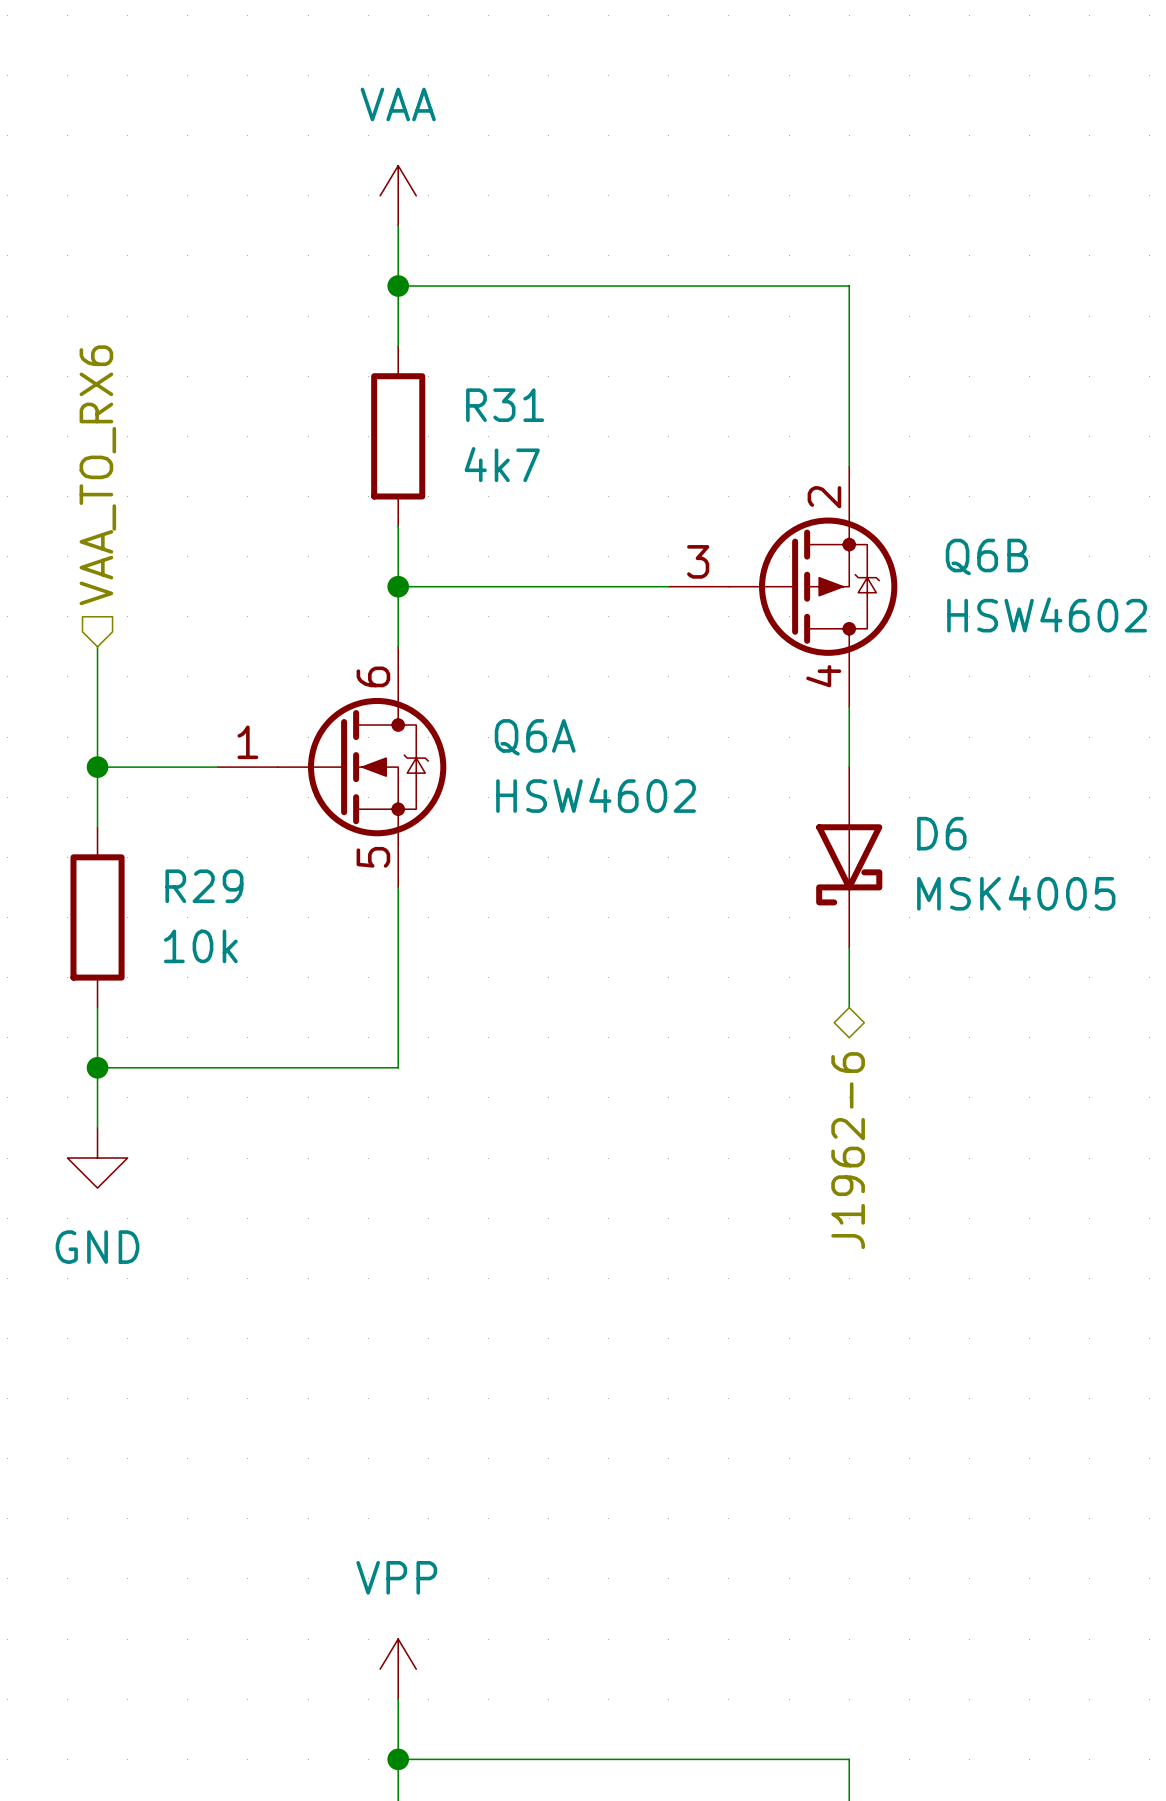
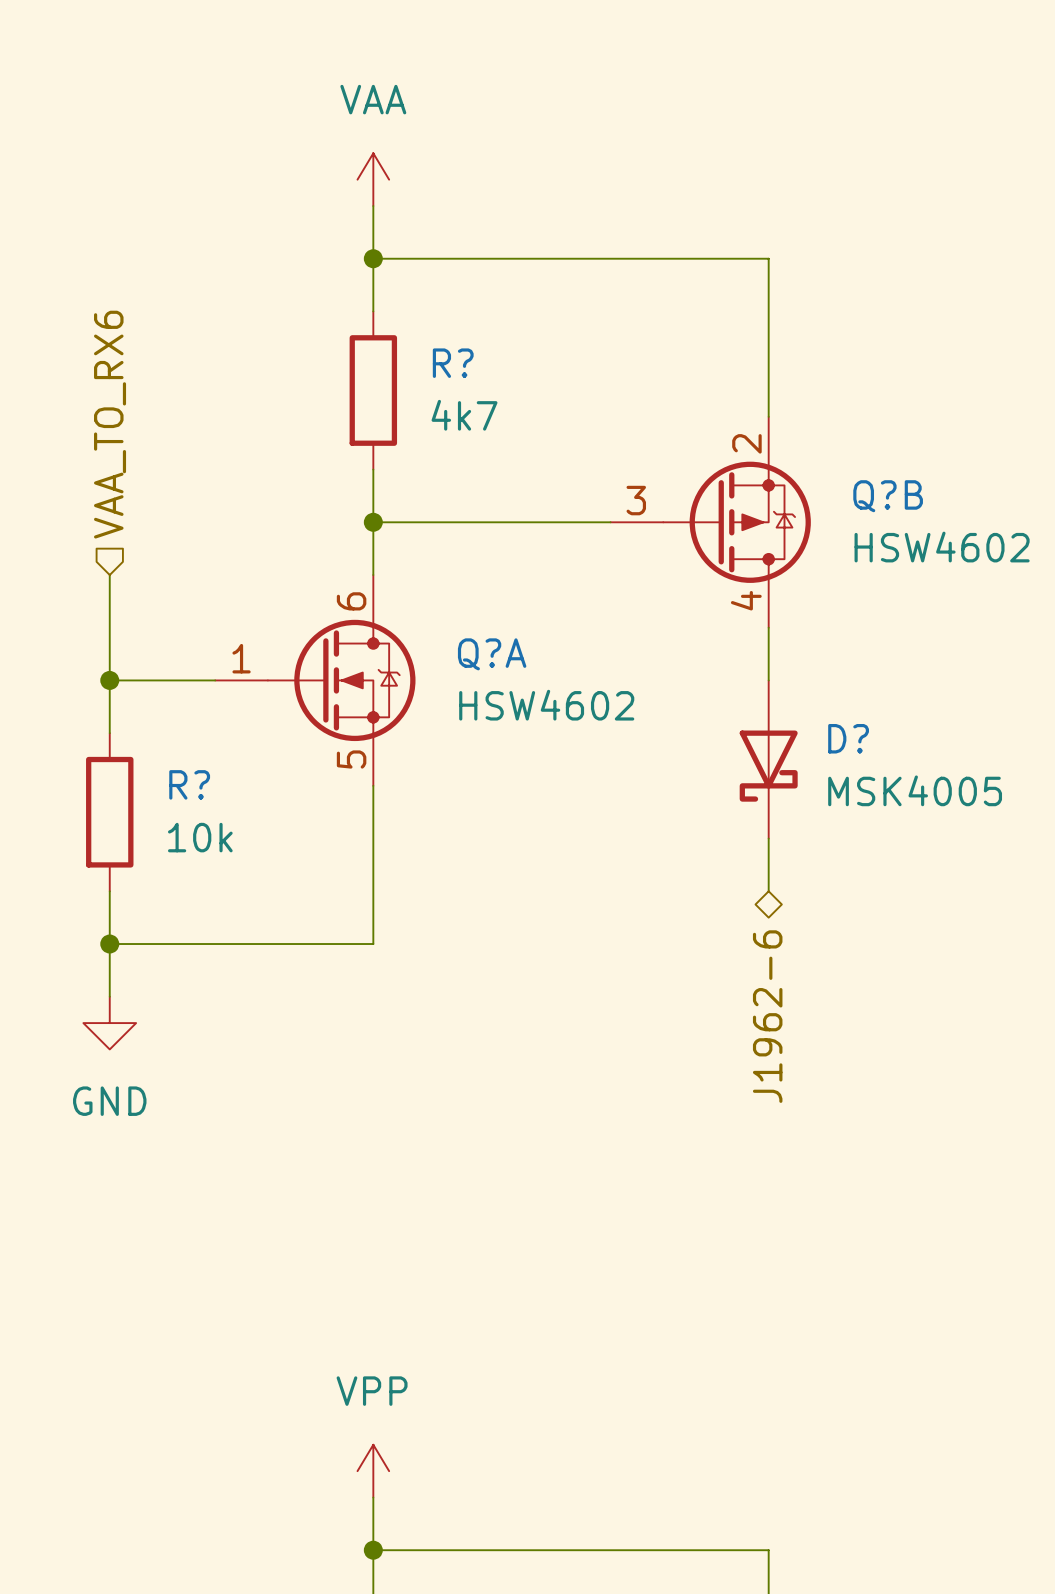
R31 name: R31 (505, 405) -> R? (453, 363)
Q6B name: Q6B (986, 556) -> Q?B (888, 496)
Q6A name: Q6A (535, 737) -> Q?A (492, 654)
D6 name: D6 (941, 833) -> D? (848, 738)
R29 name: R29 (204, 886) -> R? (189, 784)

